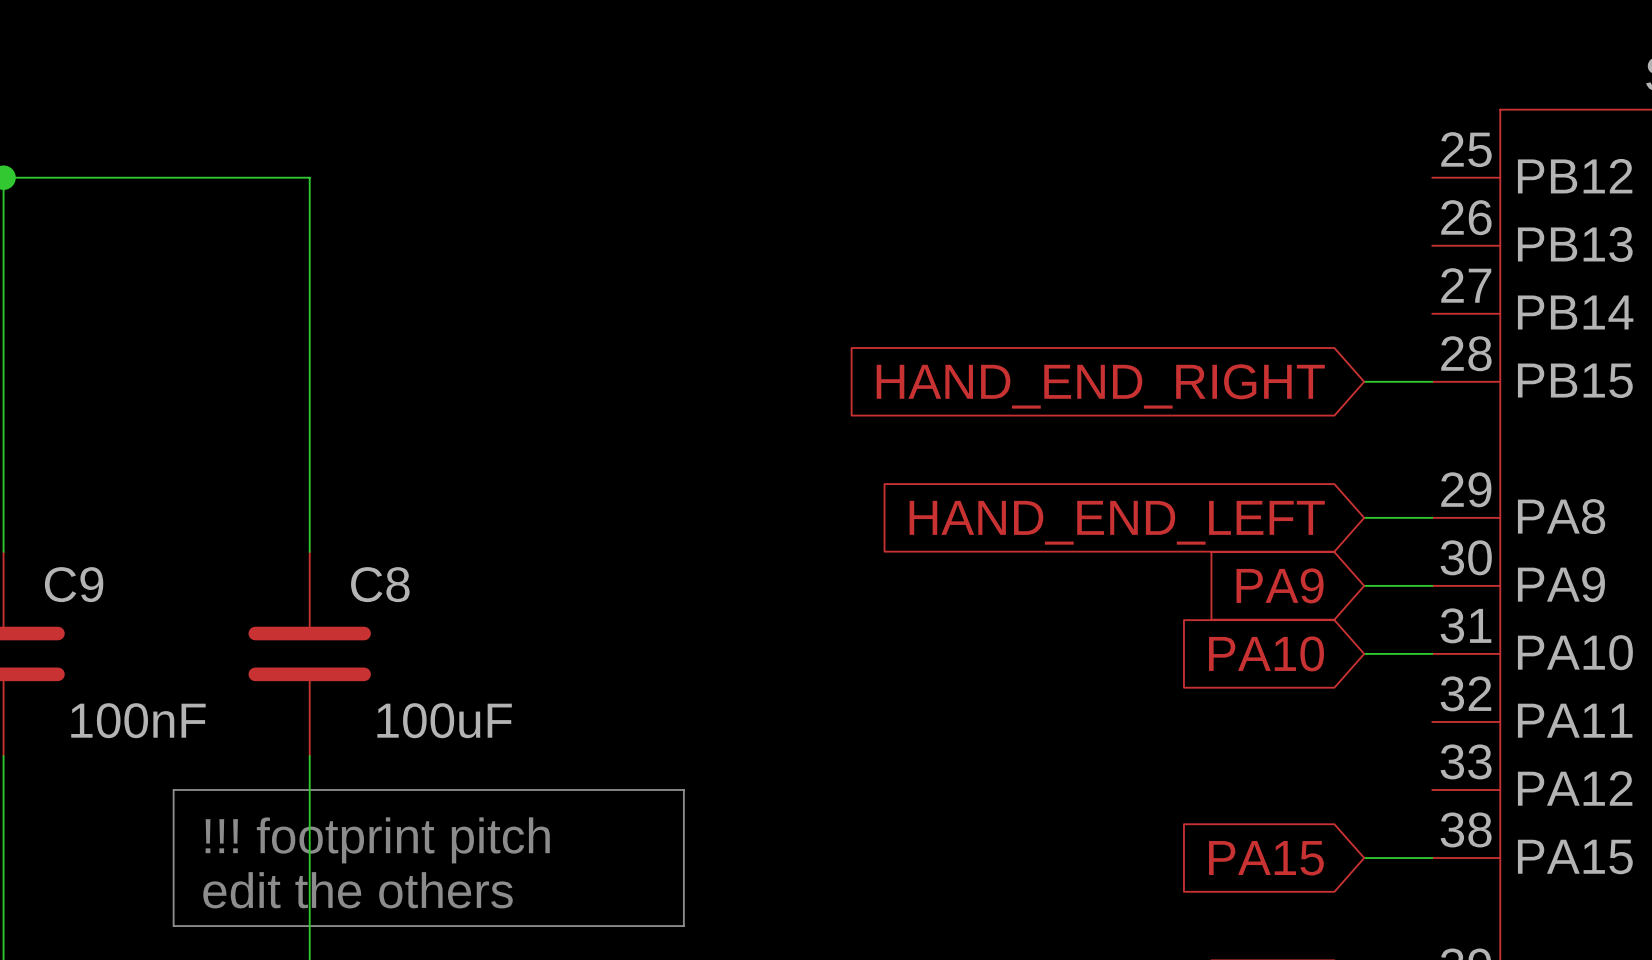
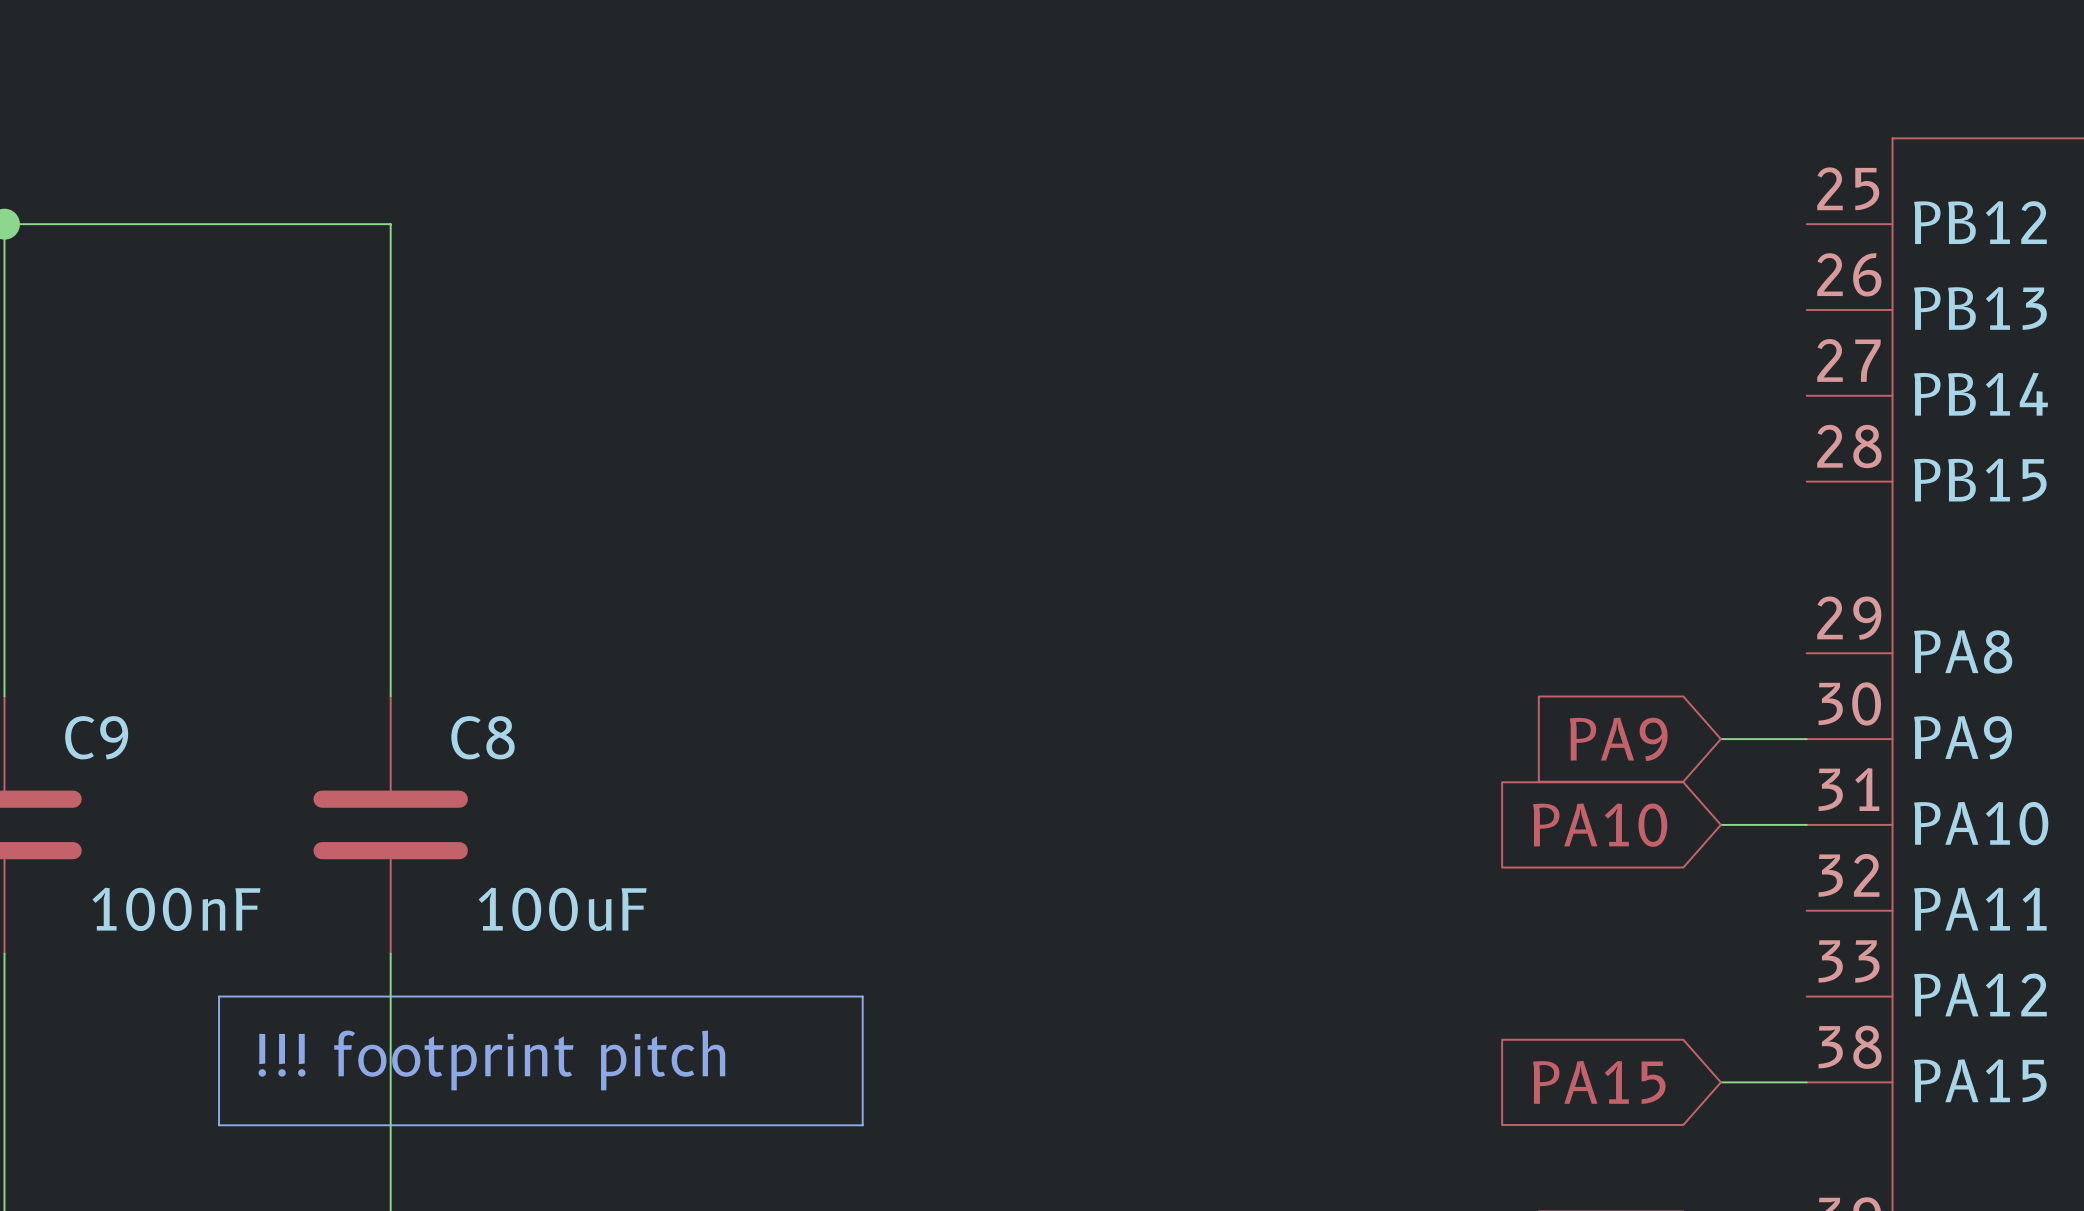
wire: (1364, 381) (1432, 381) -> none
global label: HAND_END_RIGHT (1100, 386) -> none
wire: (1364, 517) (1432, 517) -> none
global label: HAND_END_LEFT (1117, 522) -> none
text: edit the others (358, 890) -> none
line: (173, 892) (173, 926) (683, 926) (683, 892) -> (219, 1125) (862, 1125)

